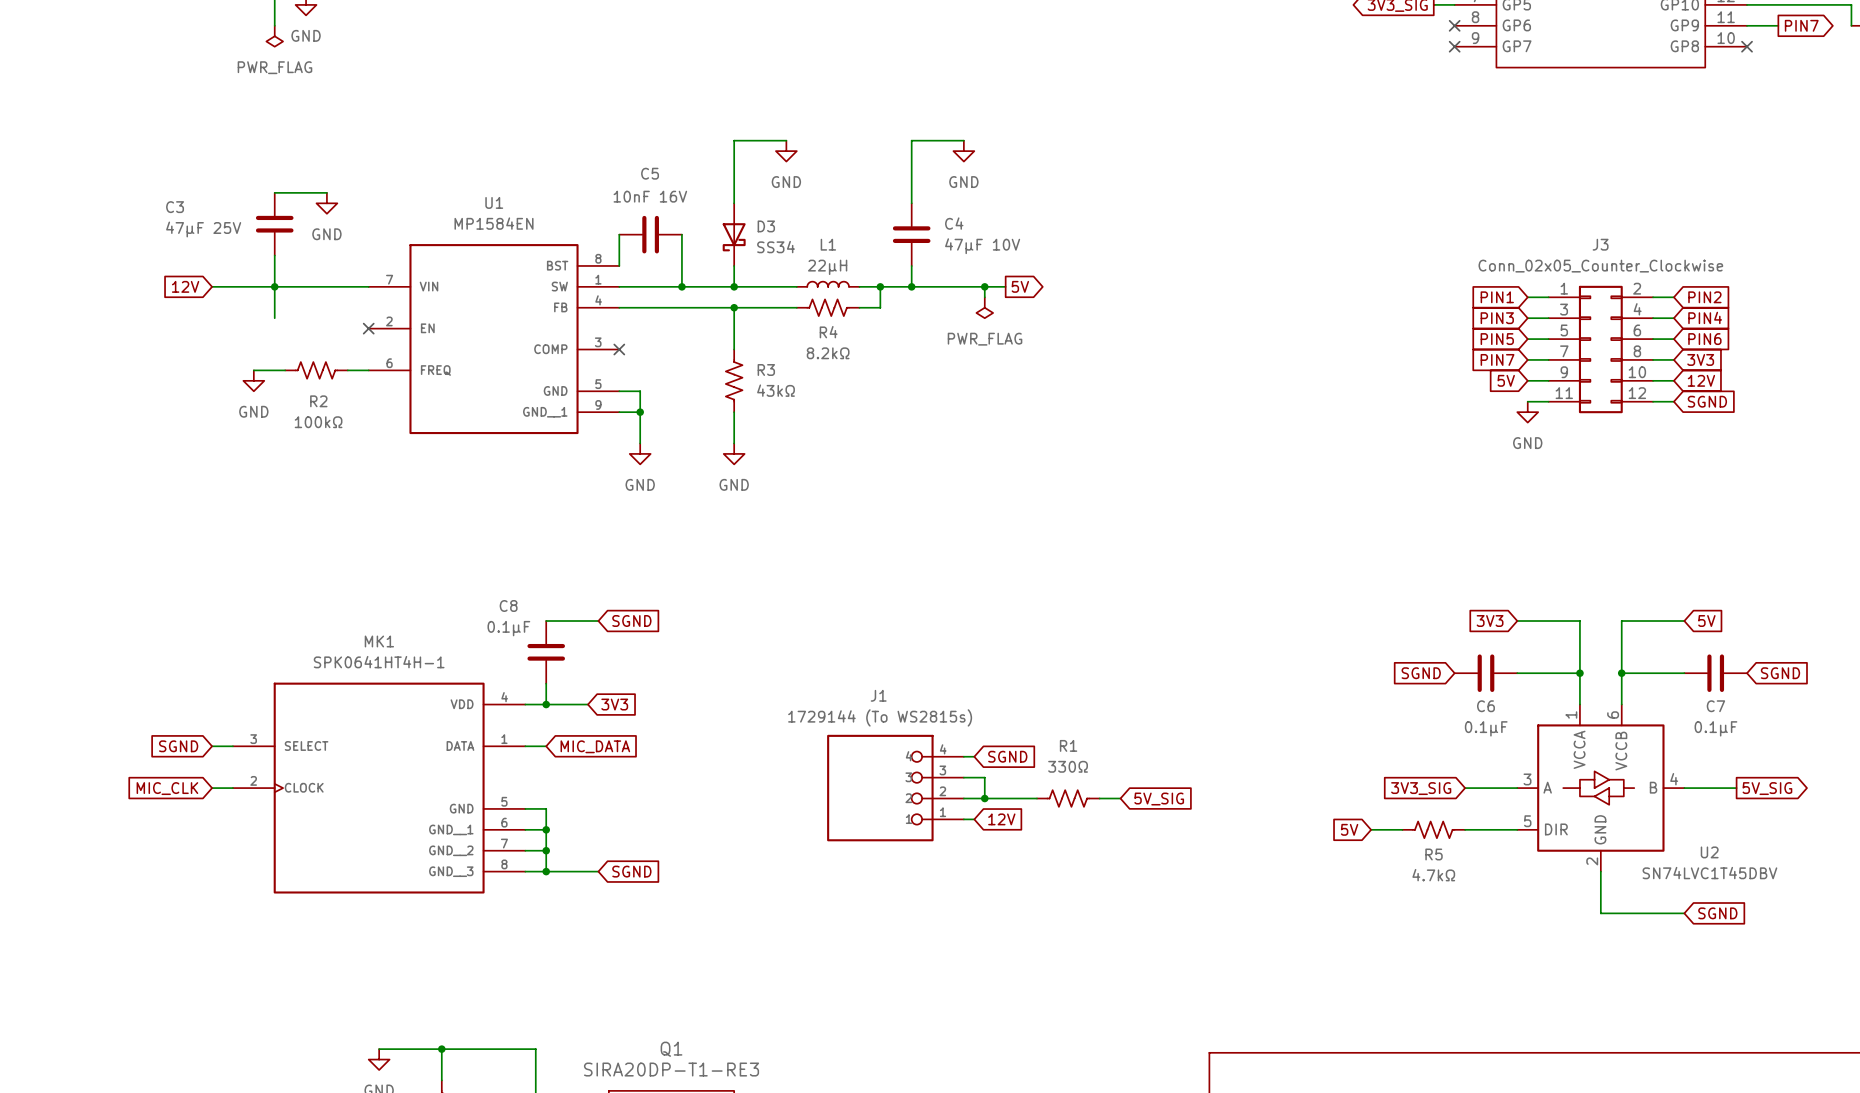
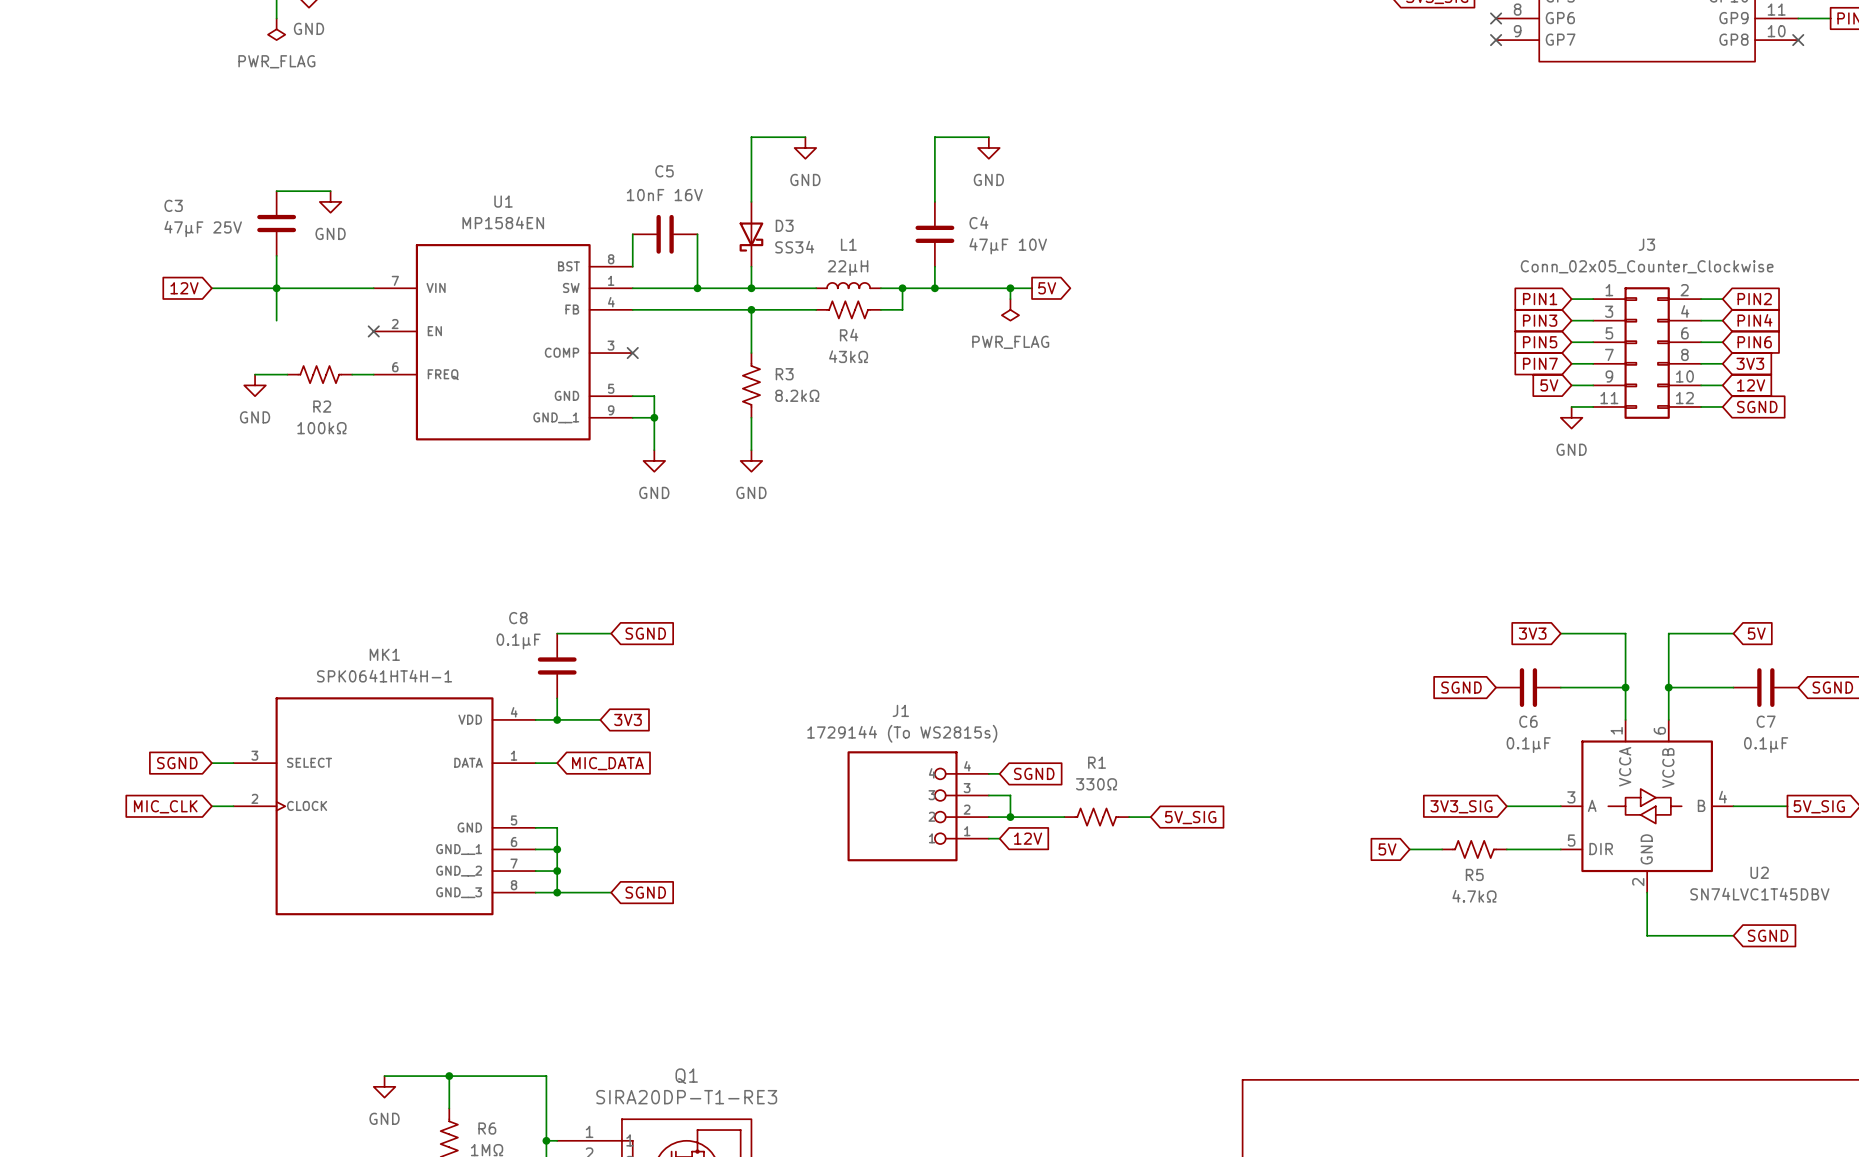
R4 value: 8.2kΩ (828, 353) -> 43kΩ (848, 356)
R3 value: 43kΩ (776, 390) -> 8.2kΩ (797, 395)

